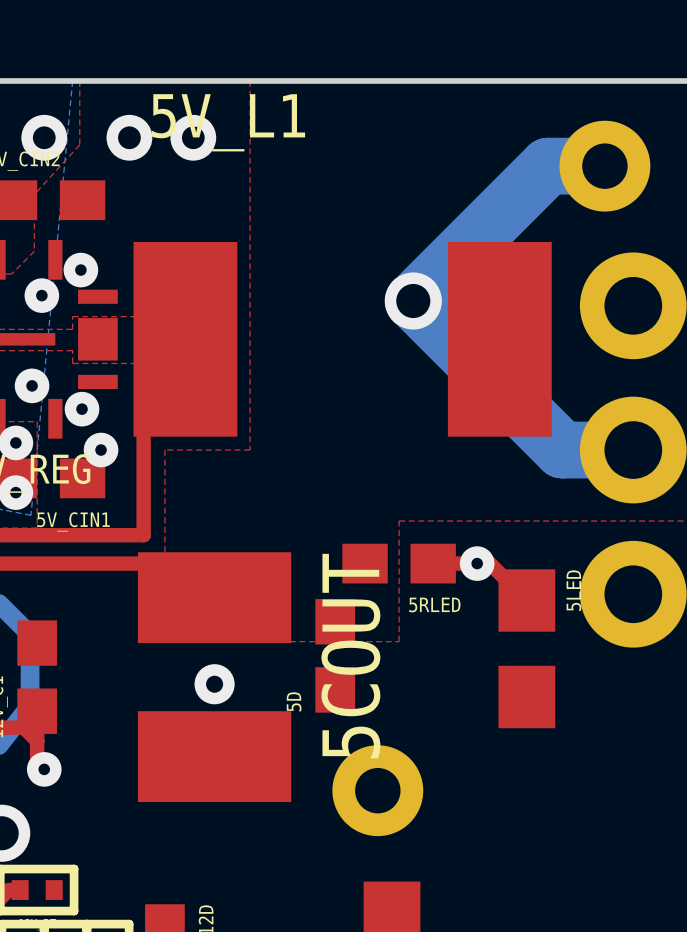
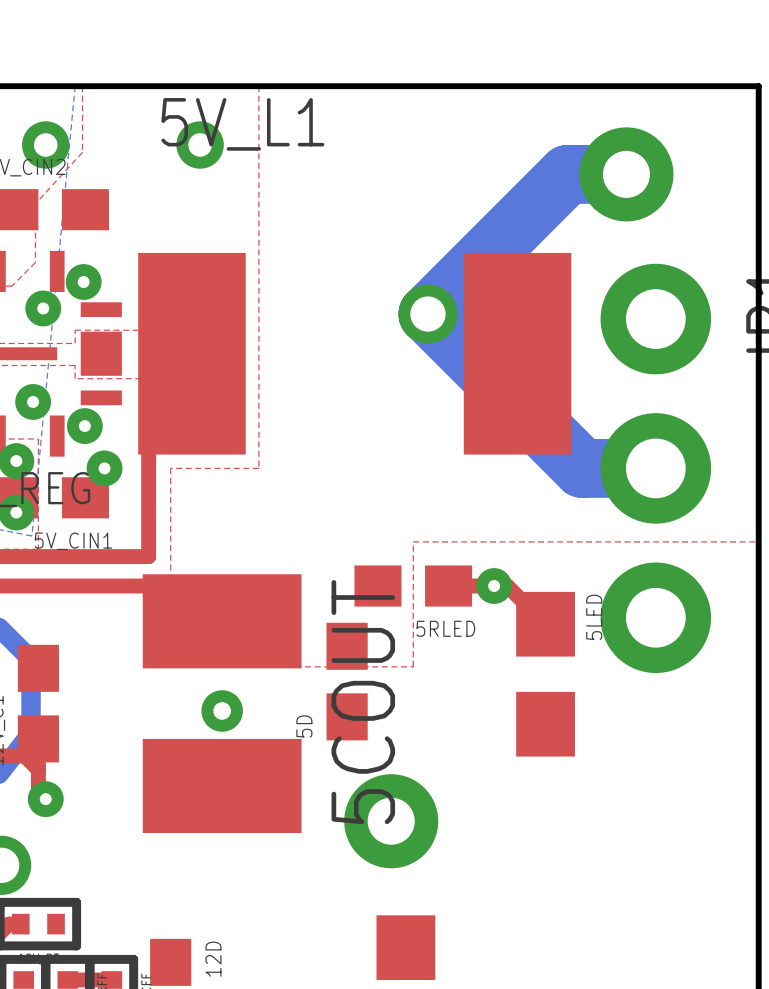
via: (129, 137) -> none

